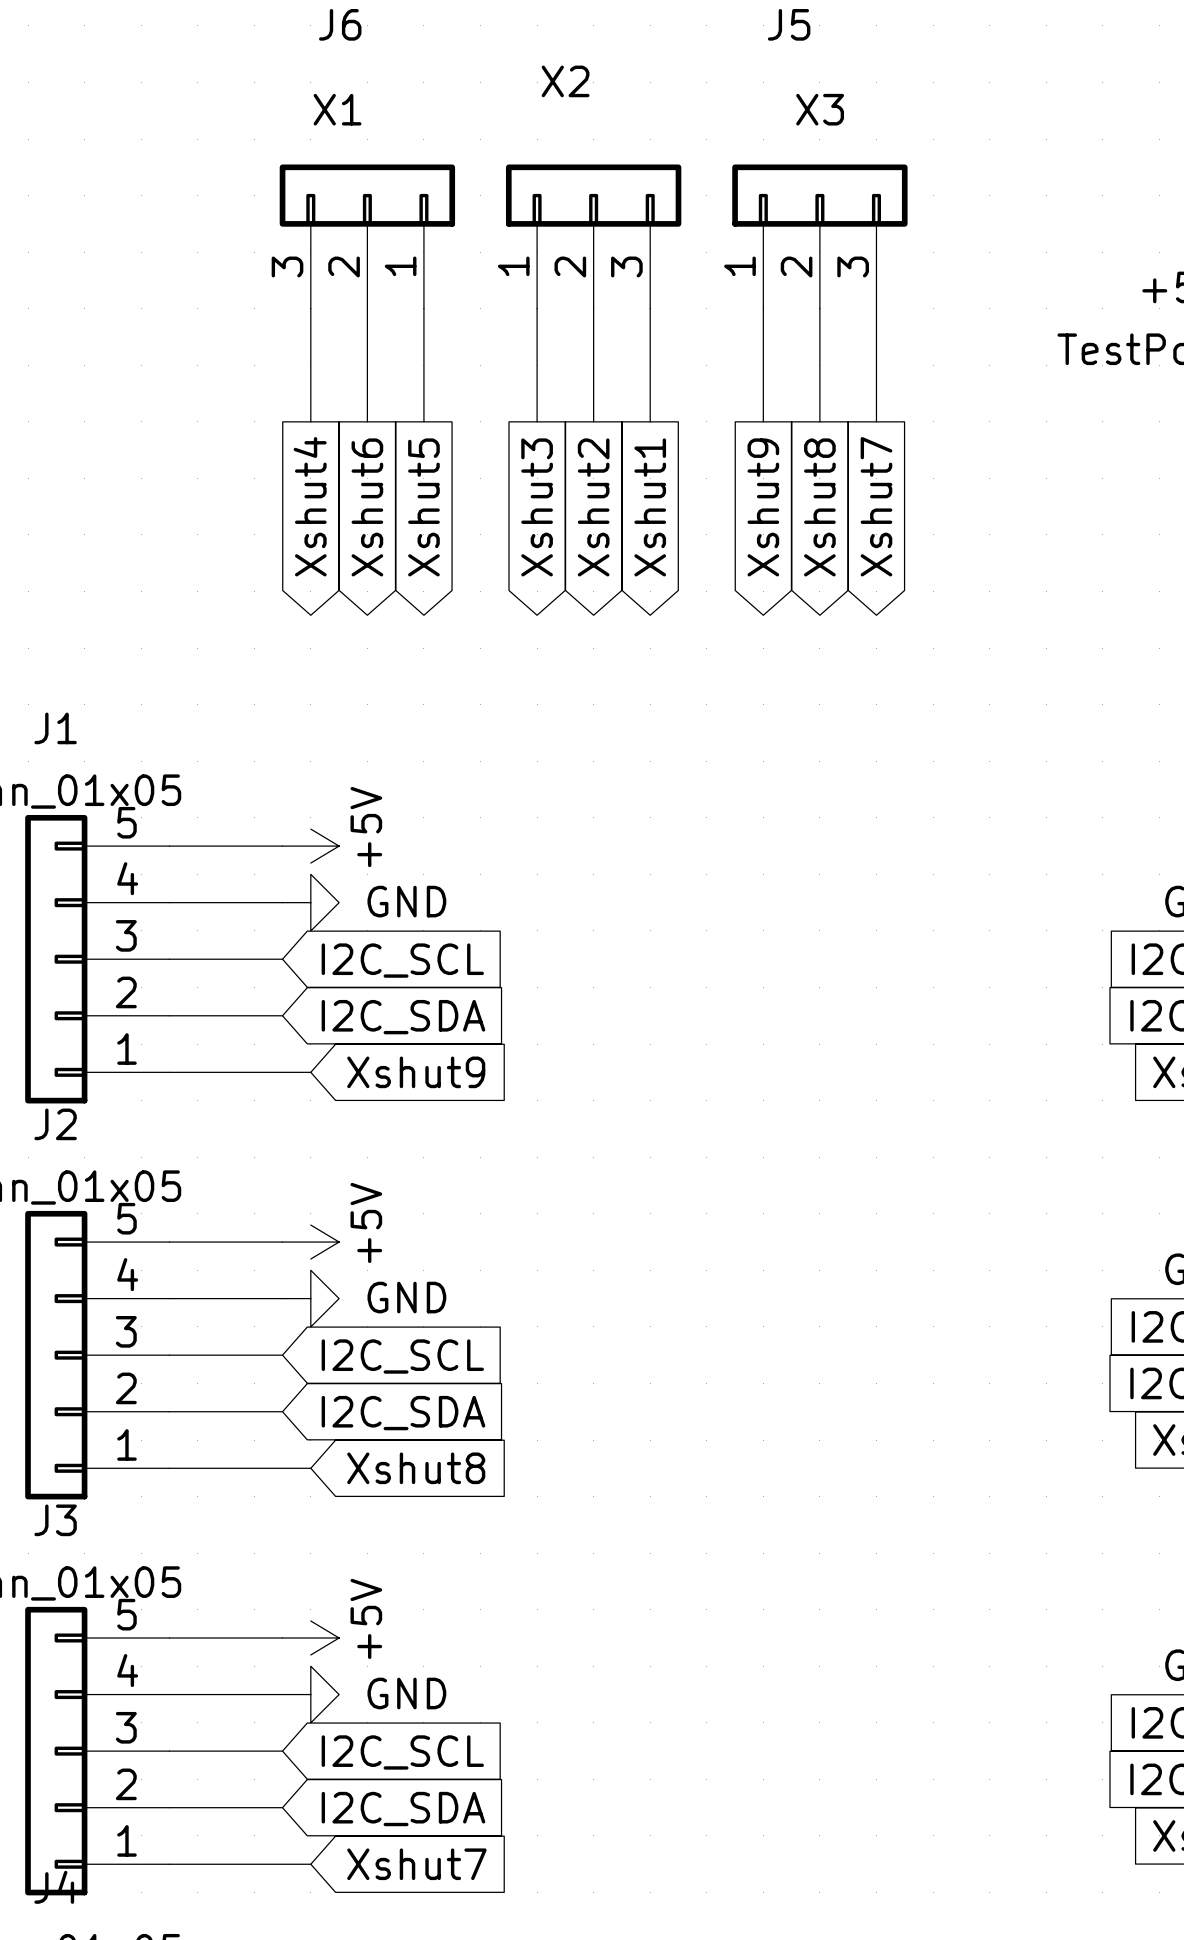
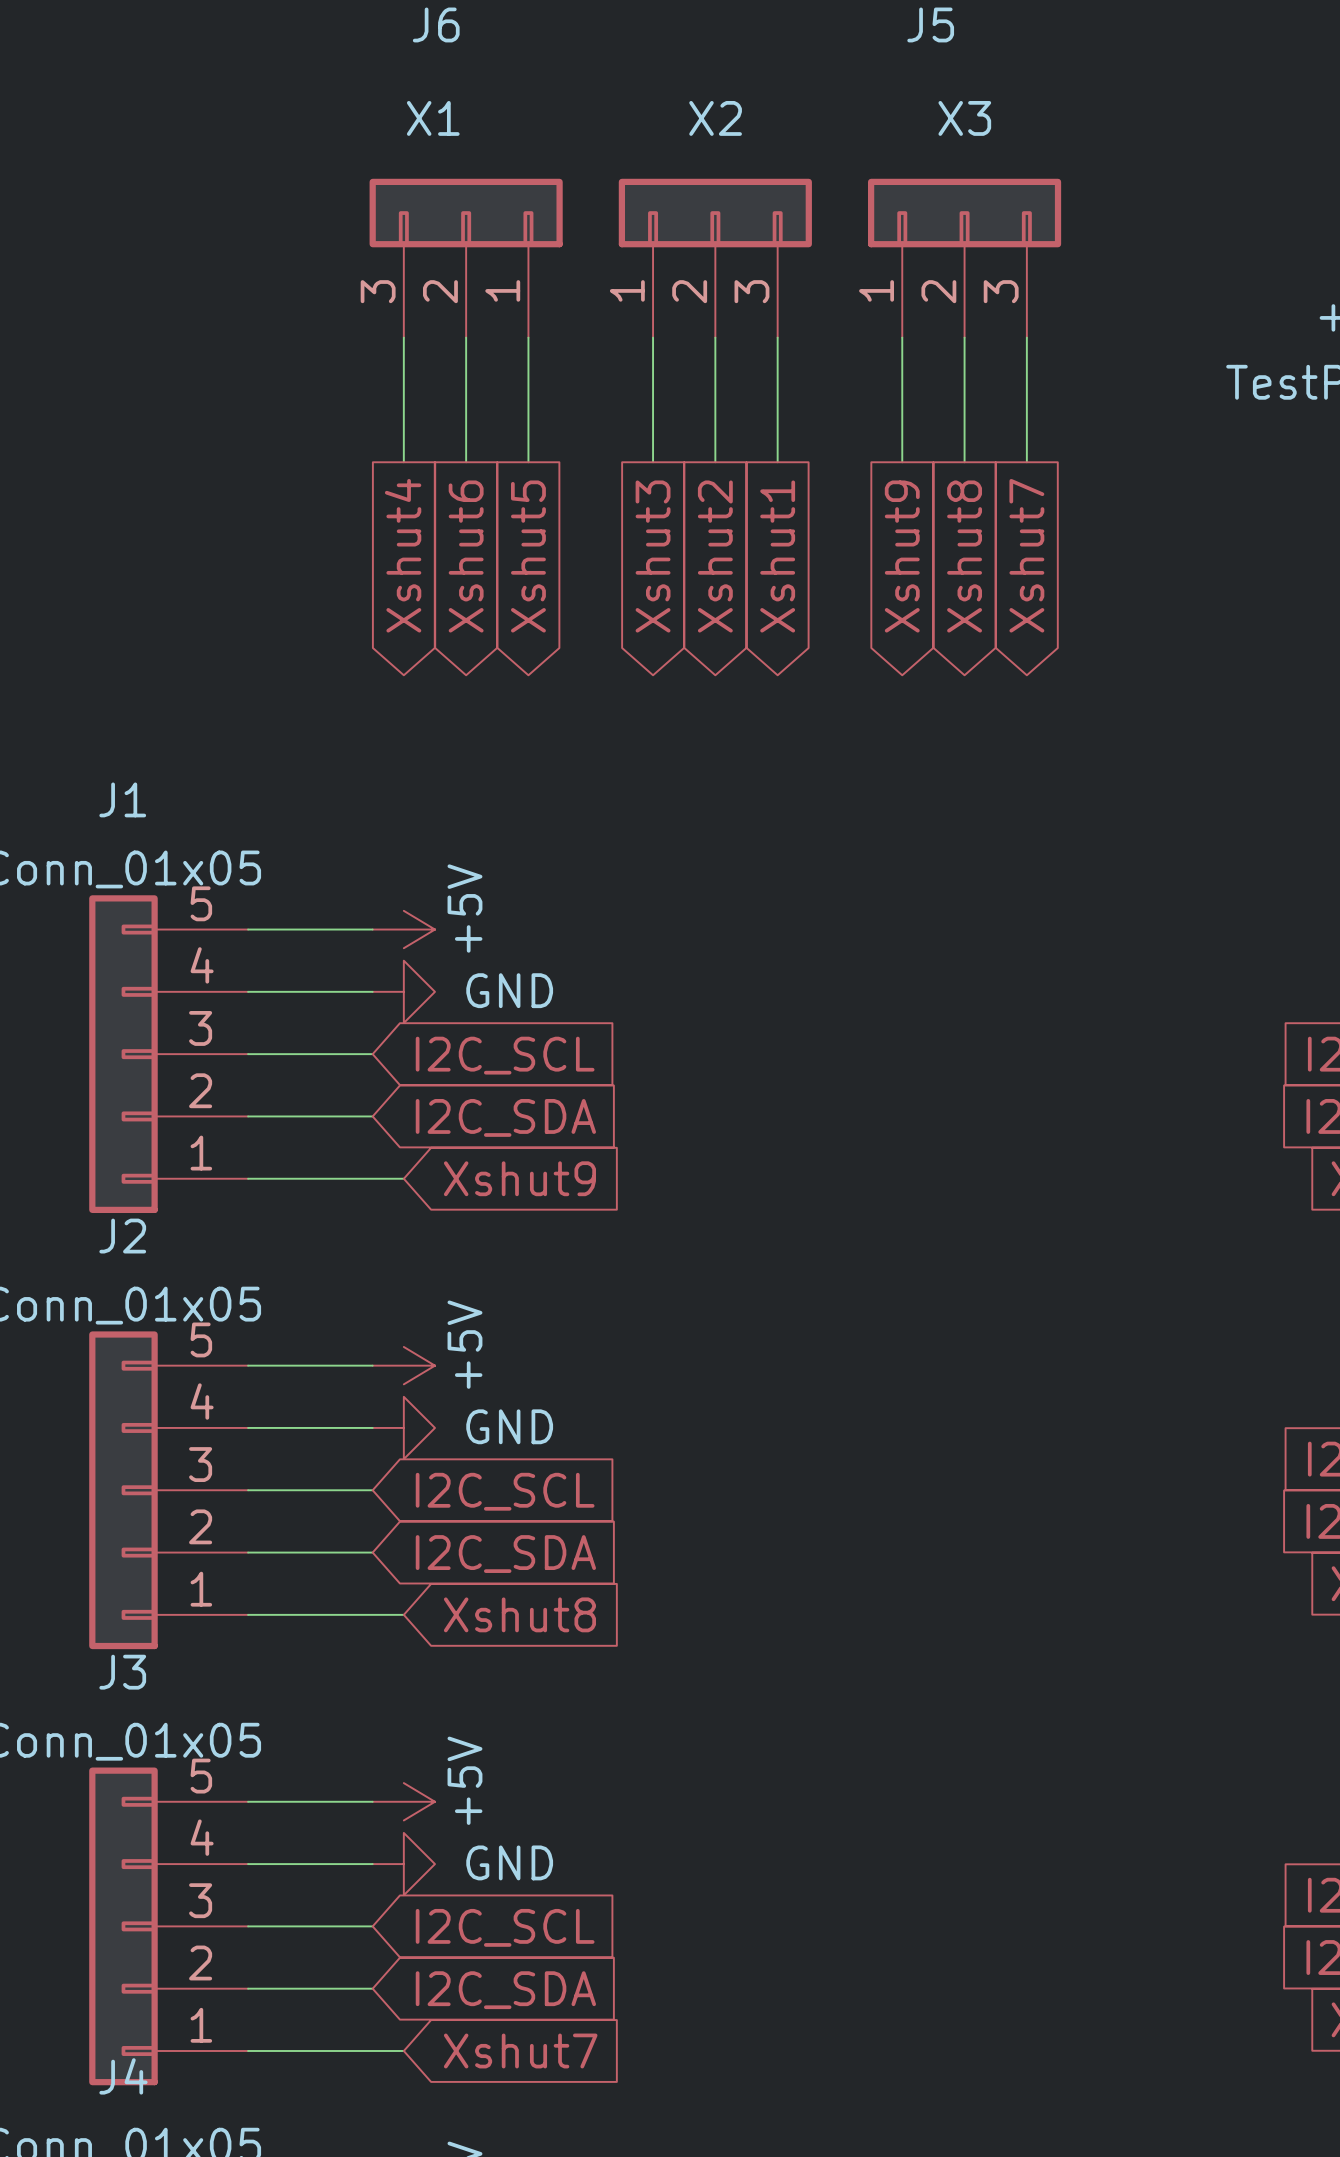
part value position: X2 (565, 81) -> X2 (715, 118)

